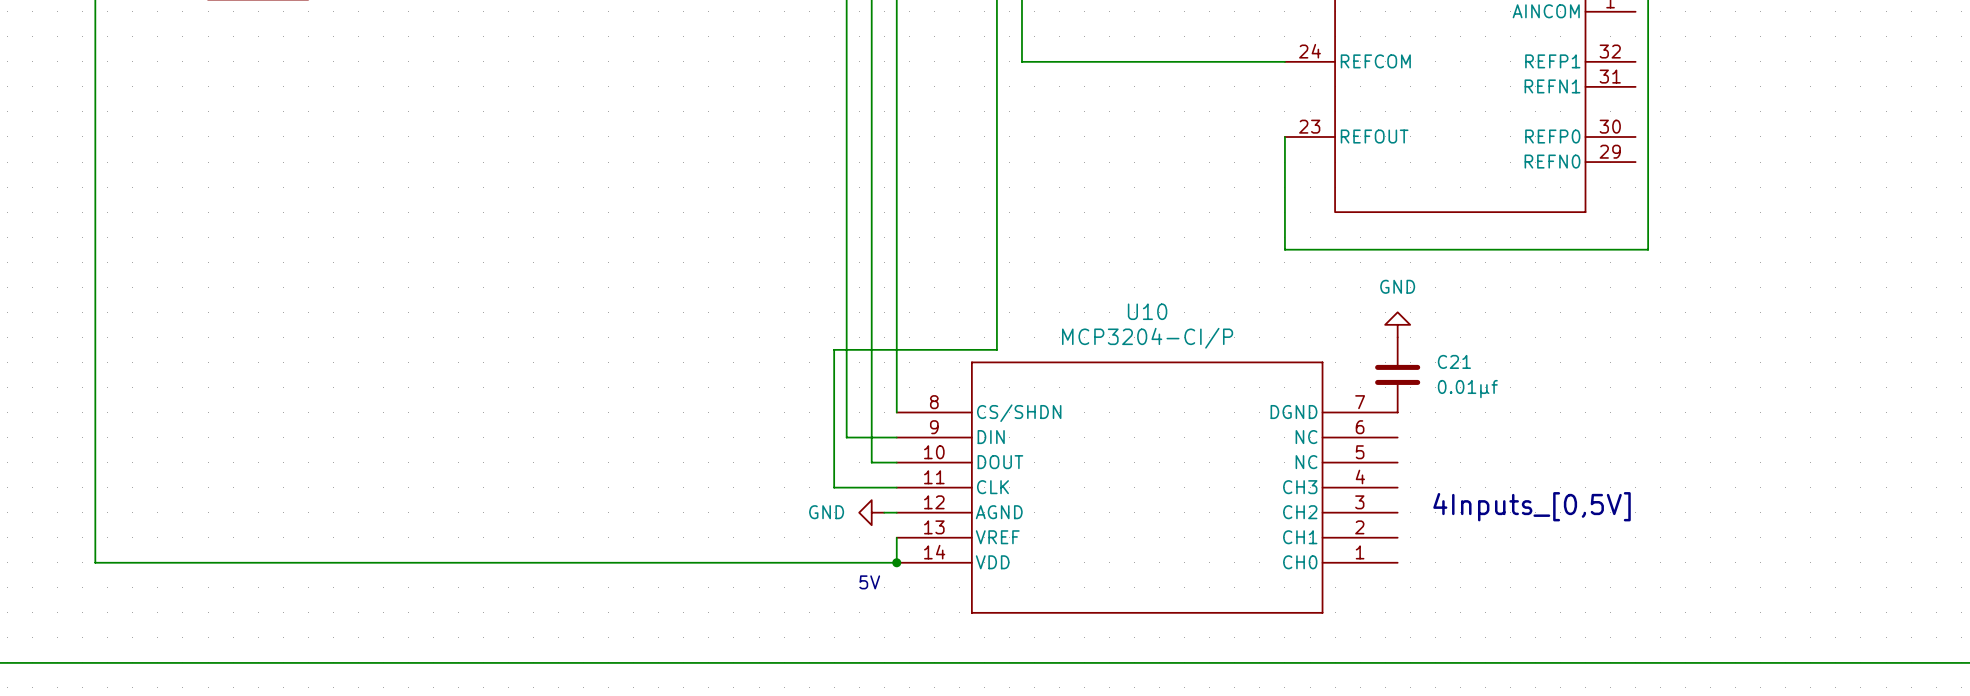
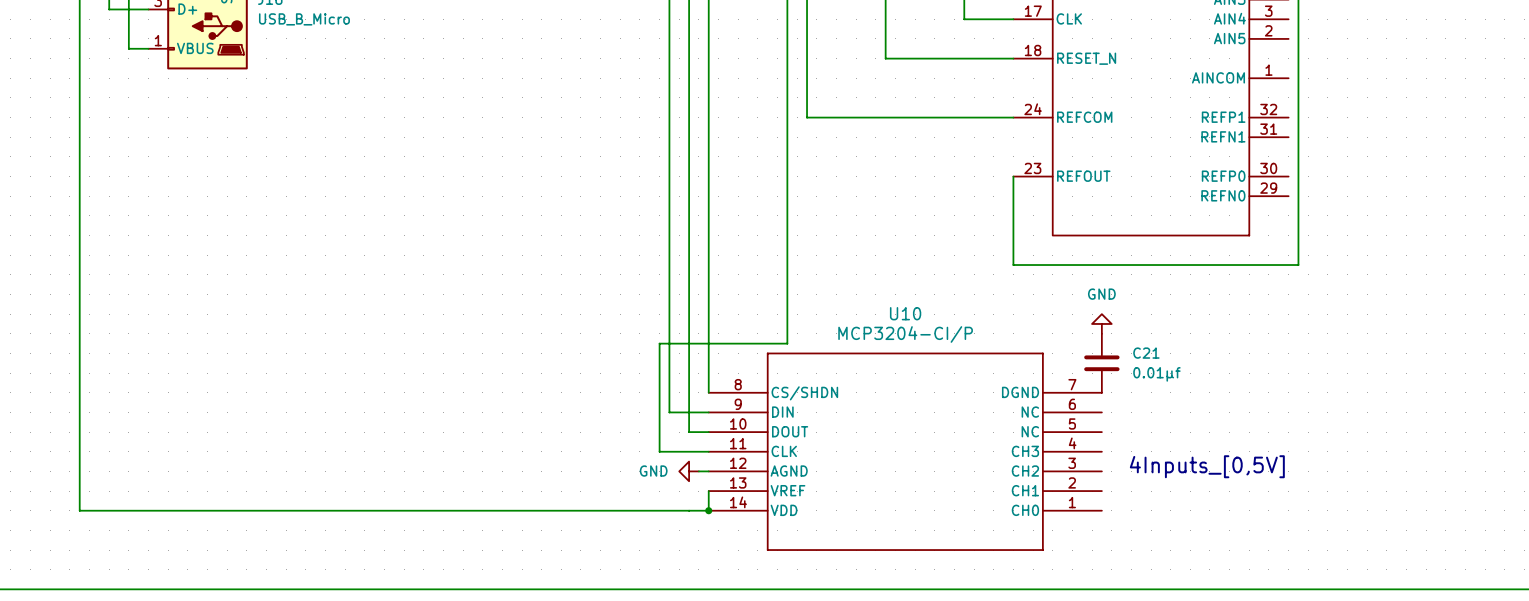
text: 5V (869, 582) -> none

